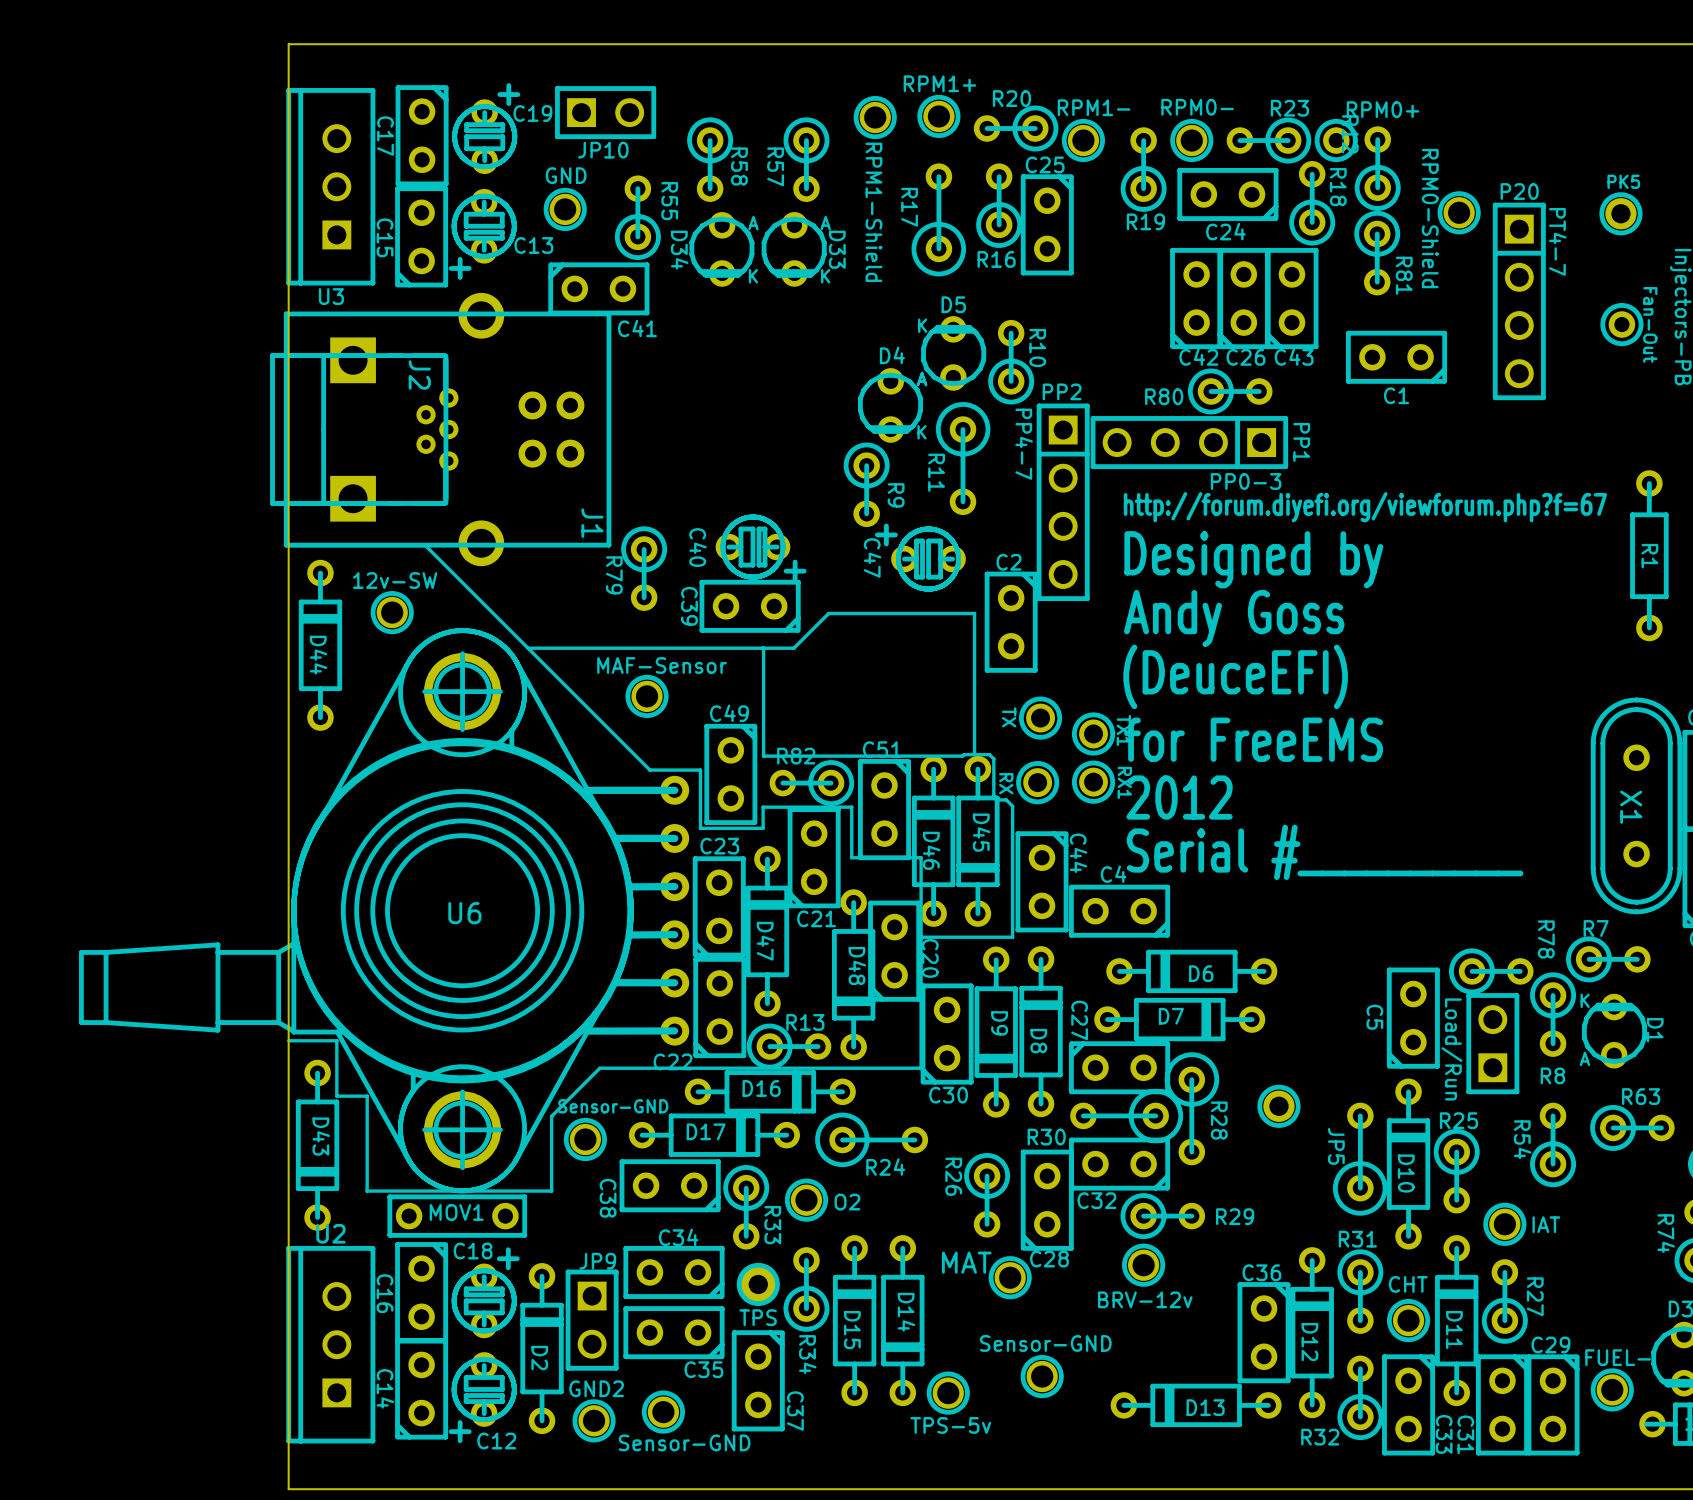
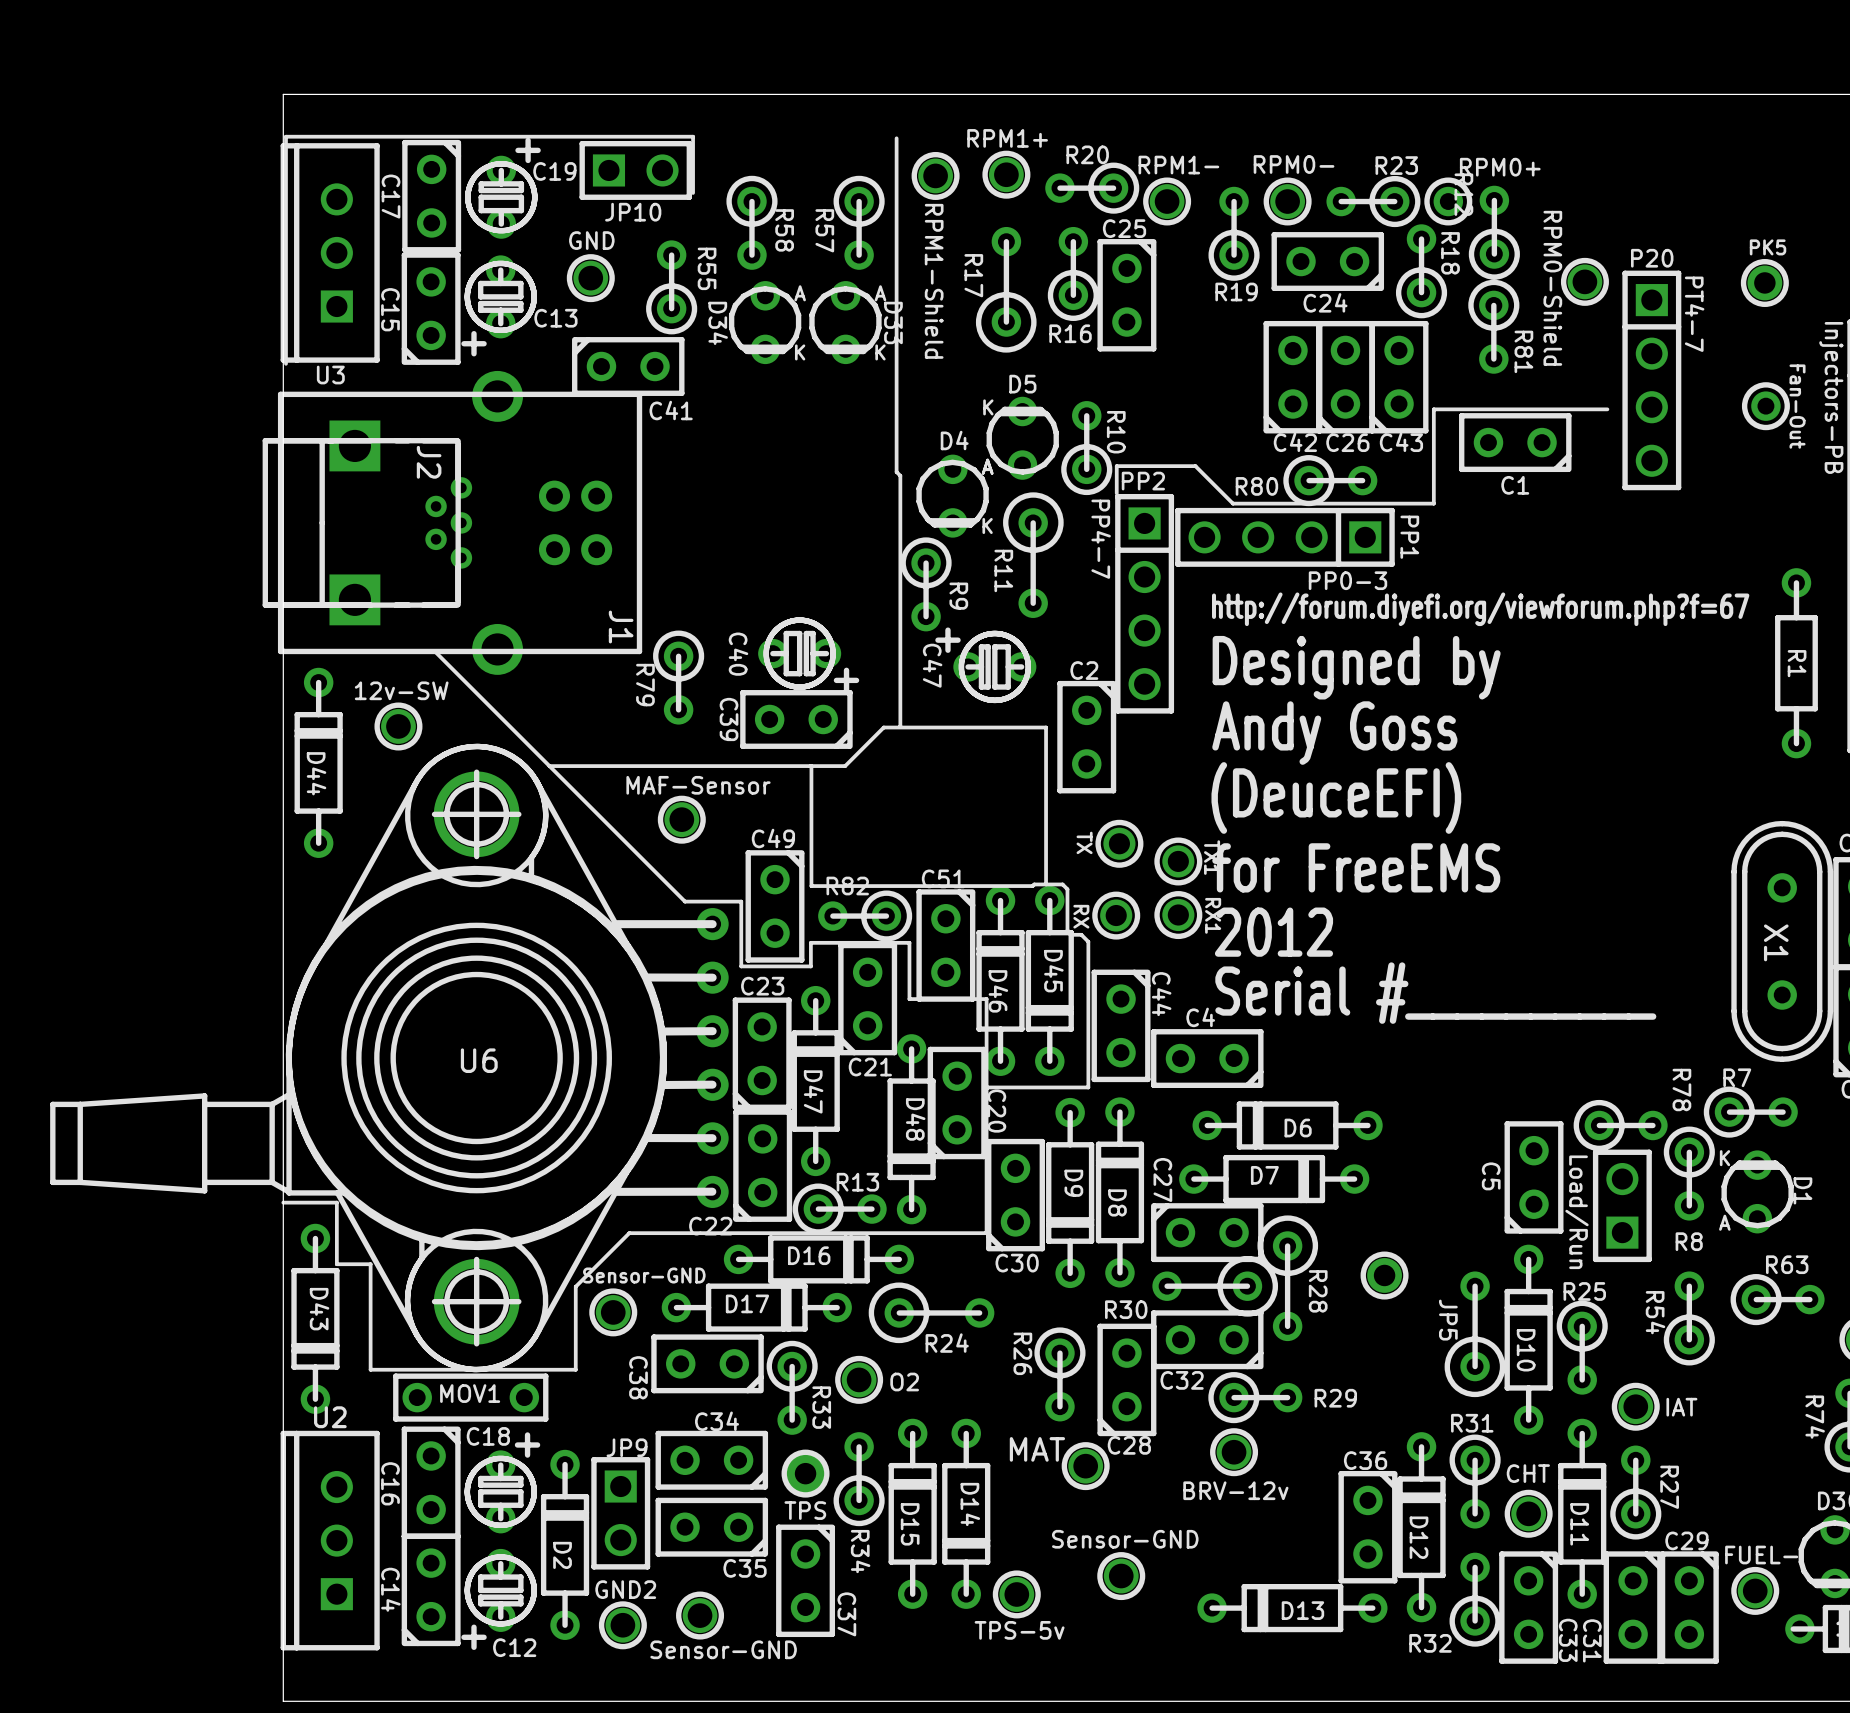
line: none -> (896, 138) (896, 472) (900, 475) (899, 726)
line: none -> (693, 192) (693, 136) (285, 136) (285, 363)
line: none -> (1607, 409) (1433, 409) (1433, 503) (1232, 503) (1195, 466) (1116, 466) (1116, 493)

